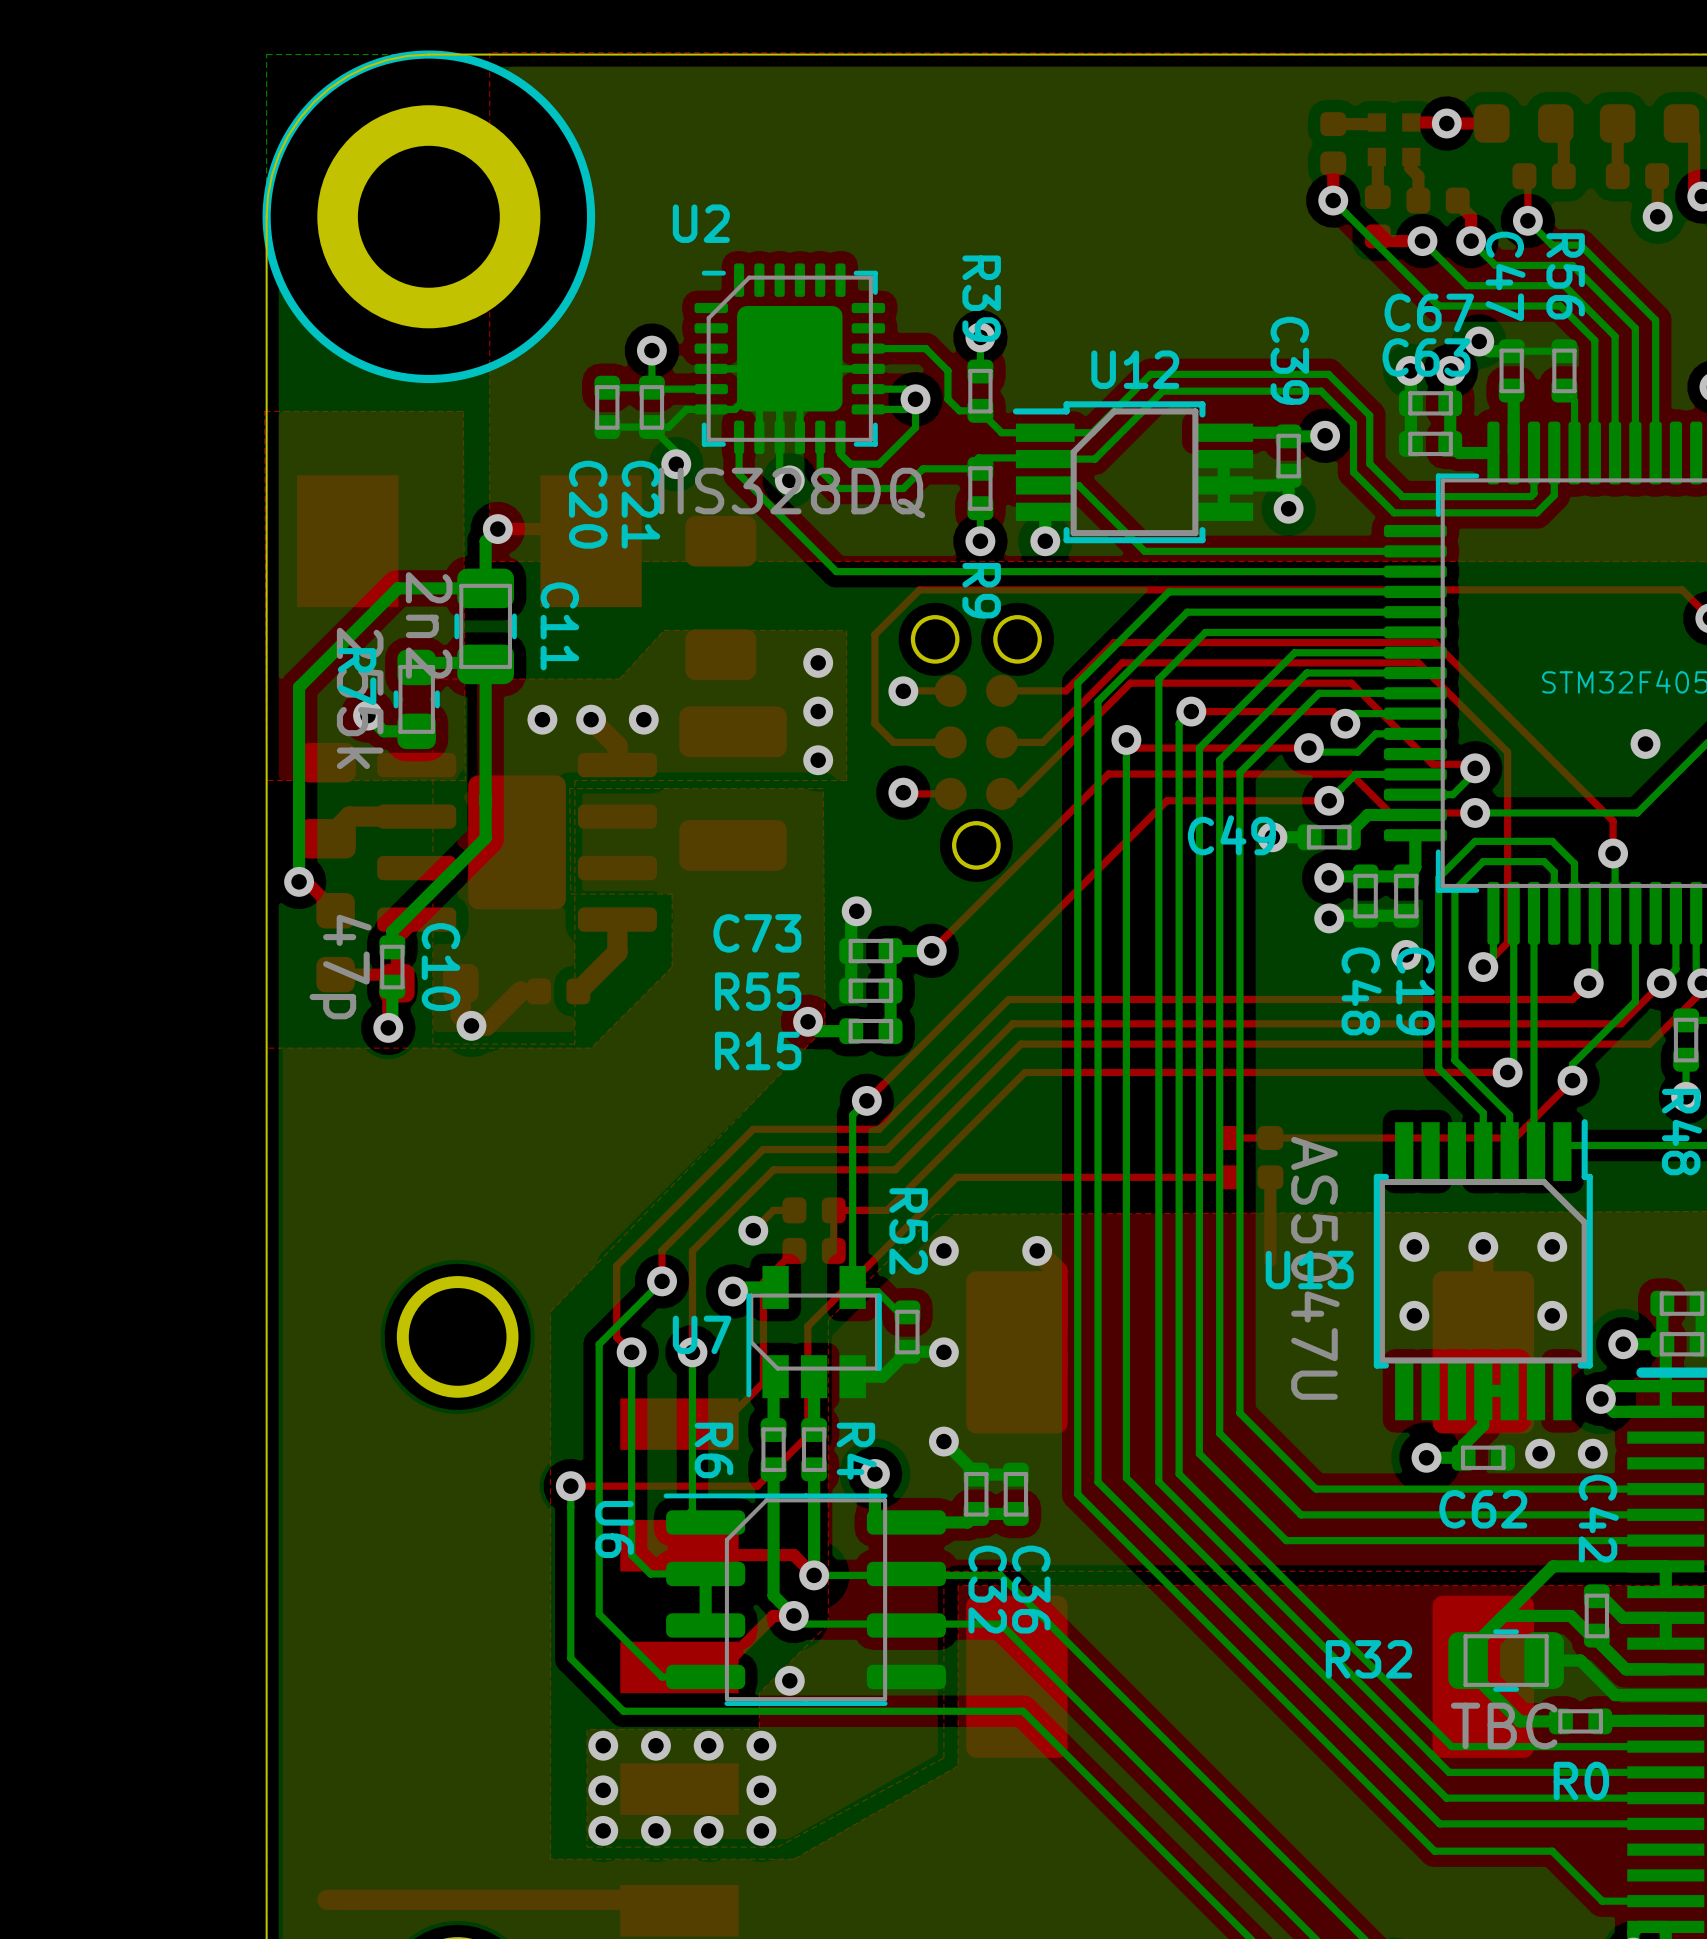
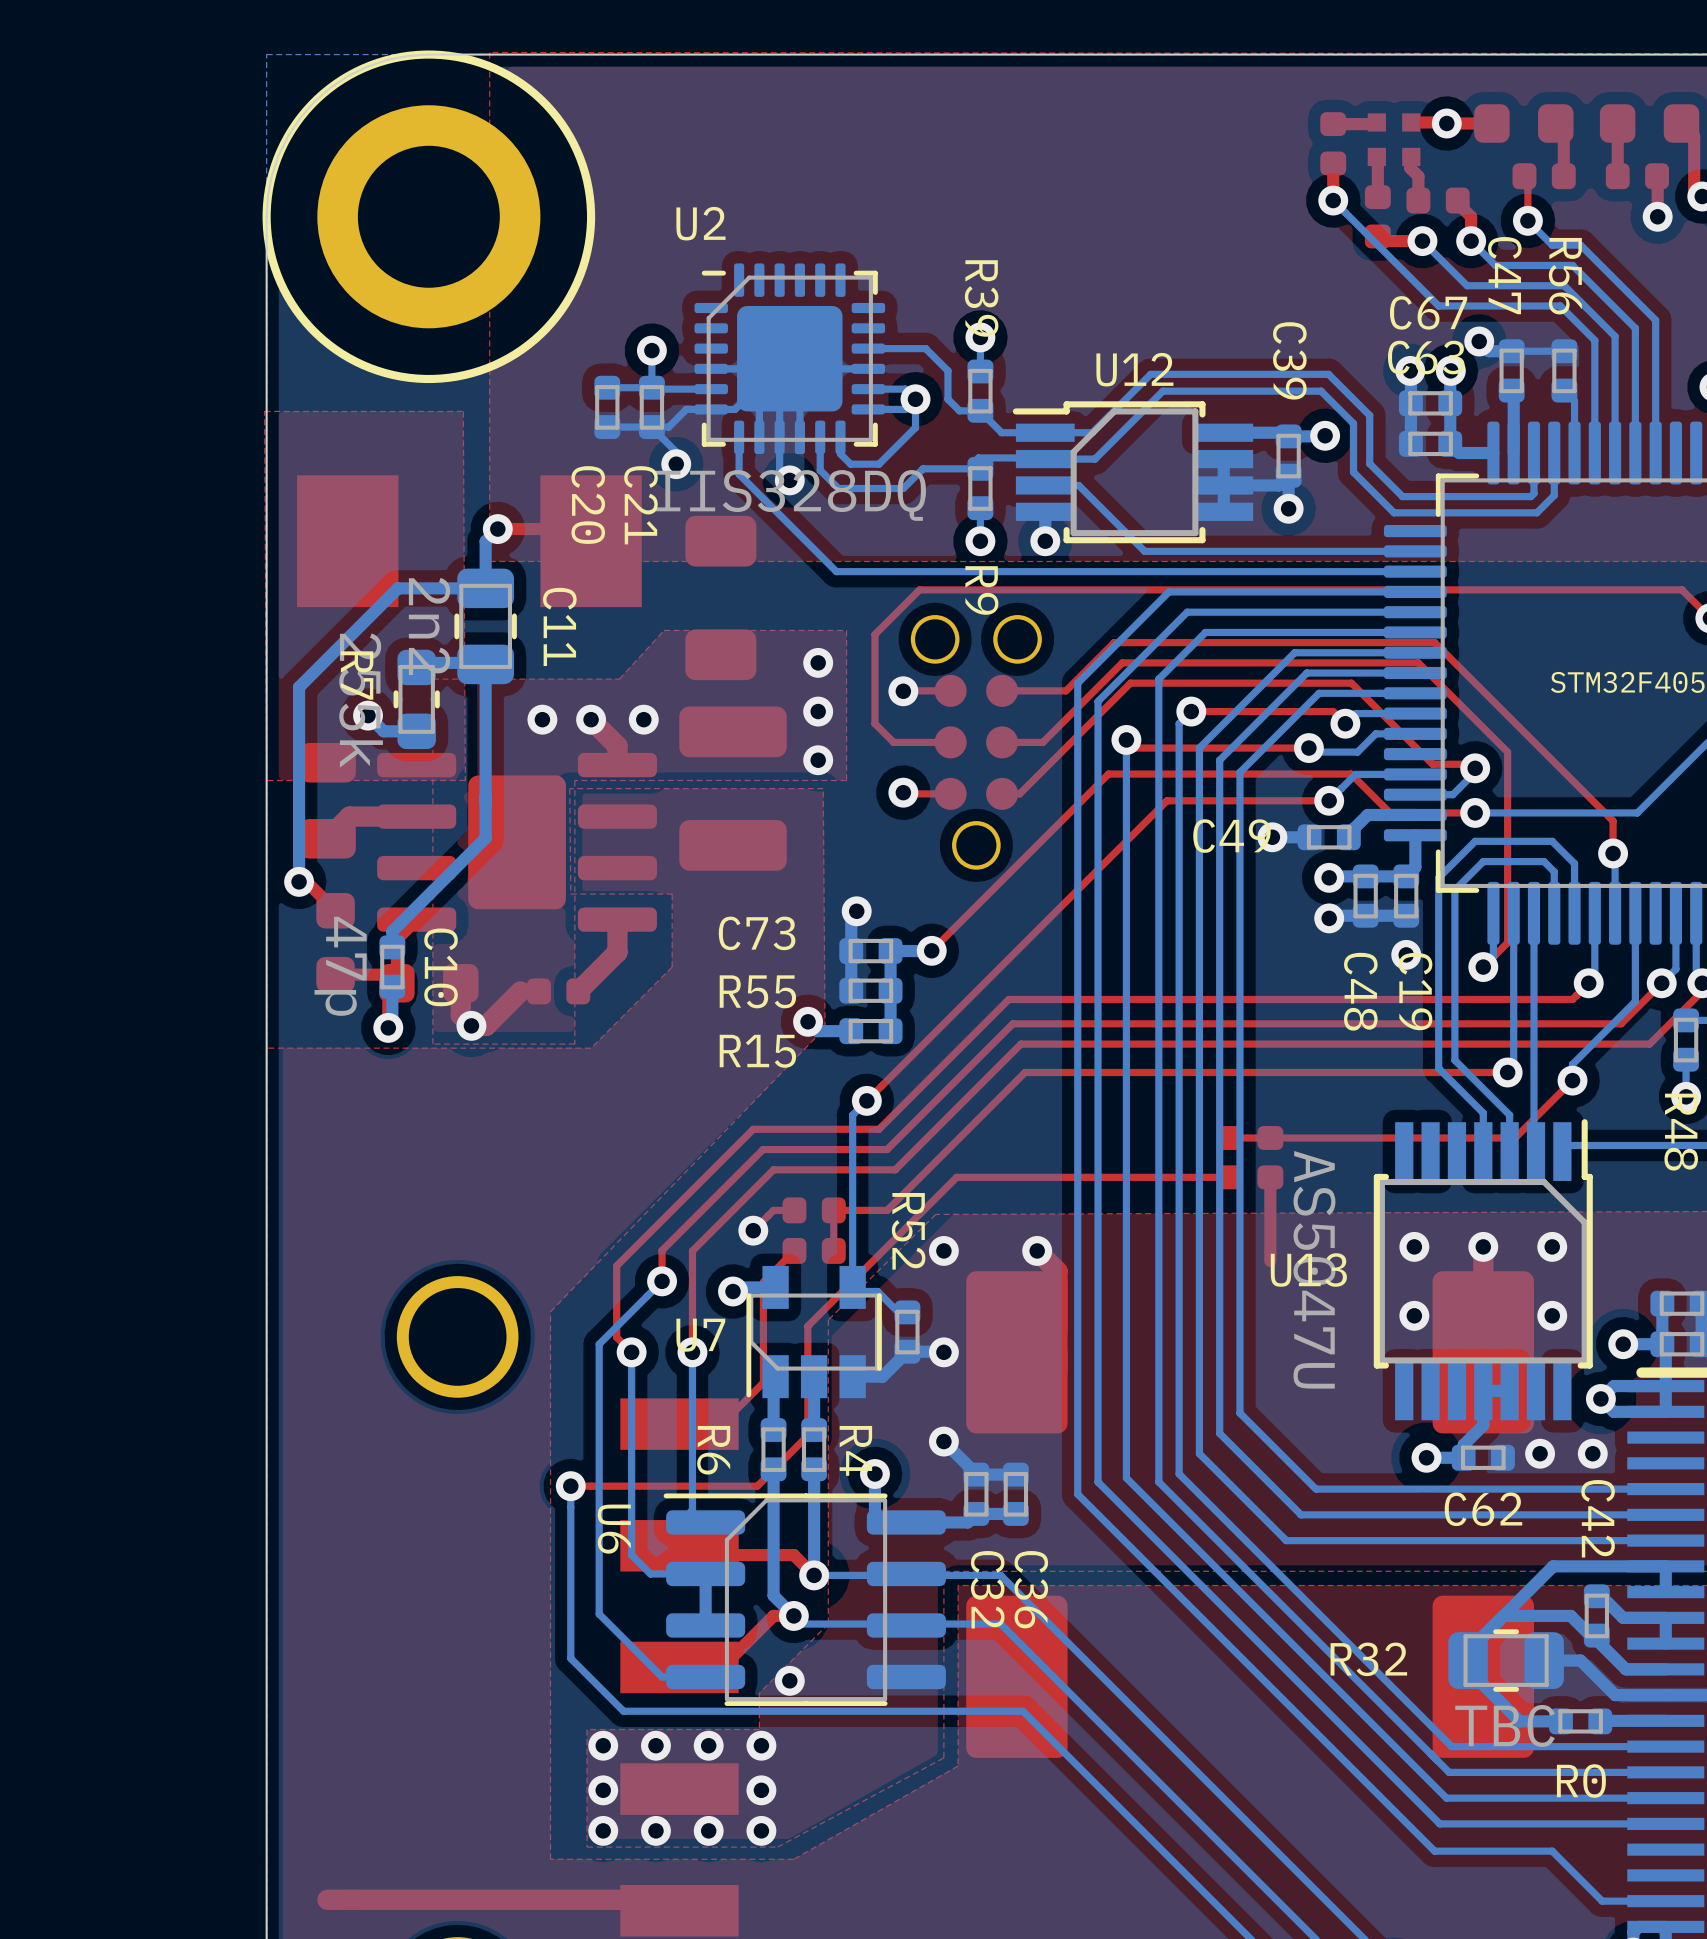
via: (1645, 744) -> none

